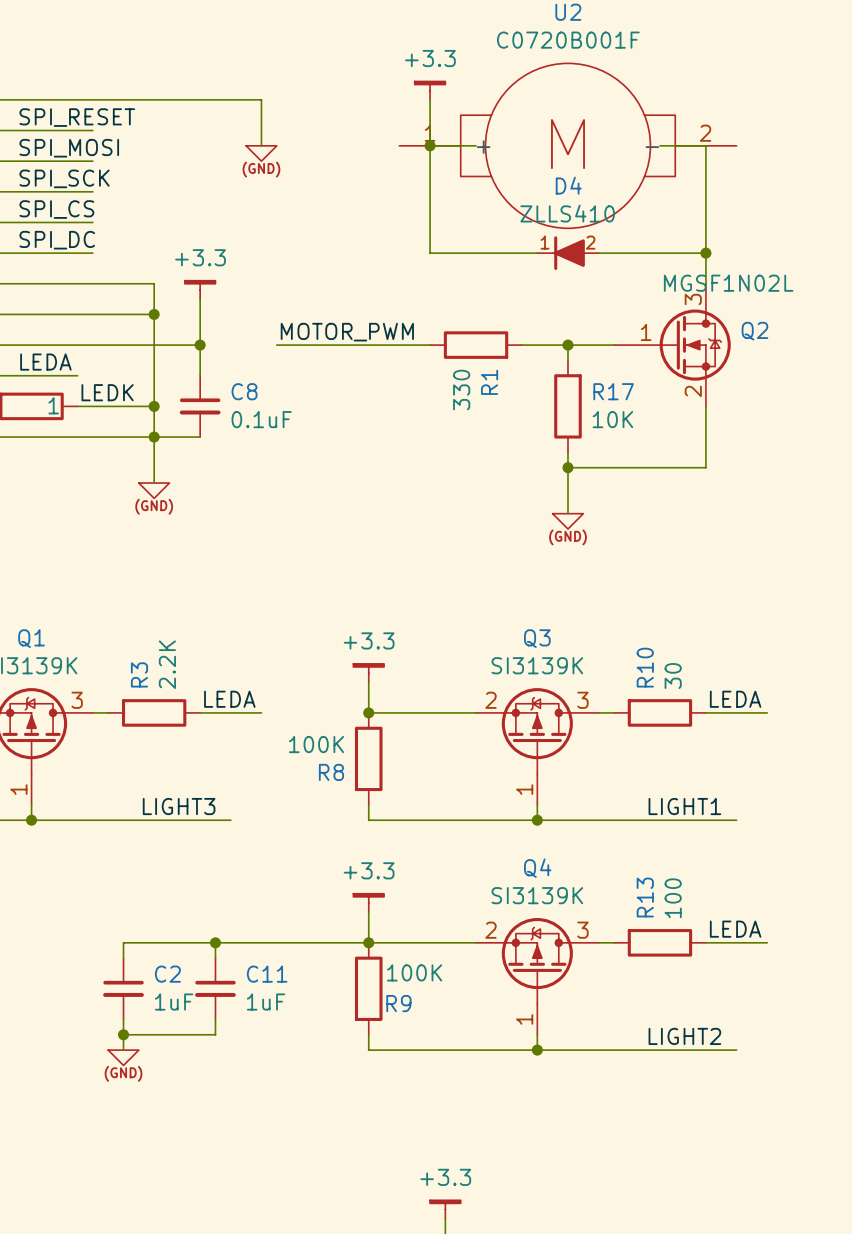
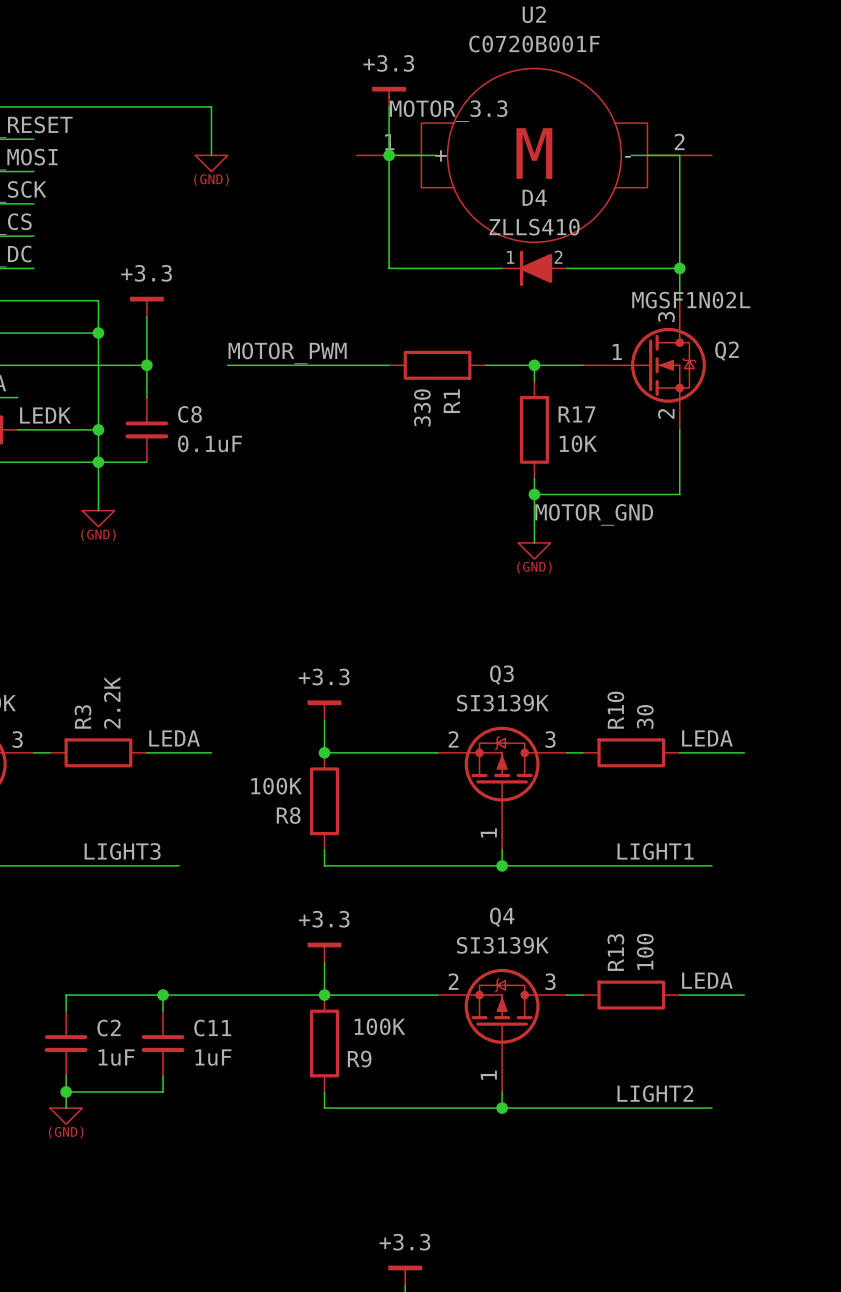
label: none -> MOTOR_3.3 (448, 111)
label: none -> MOTOR_GND (594, 514)

